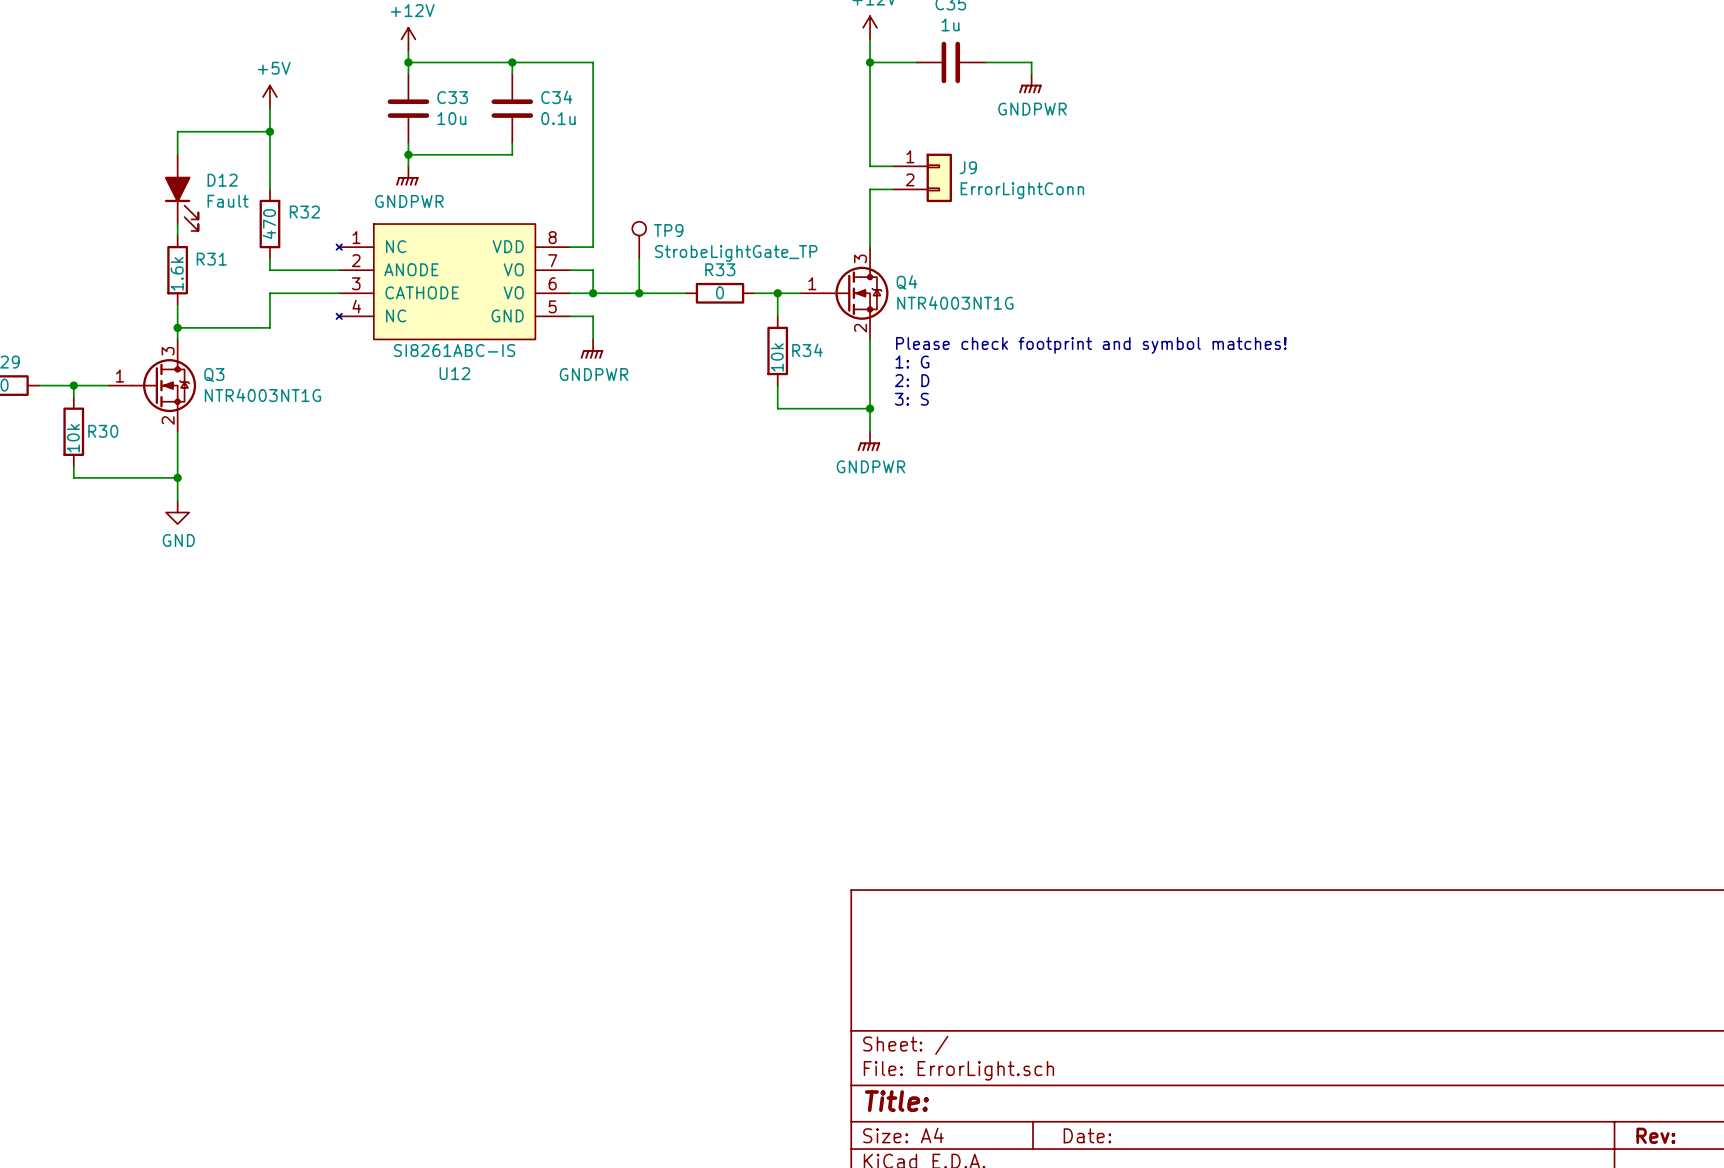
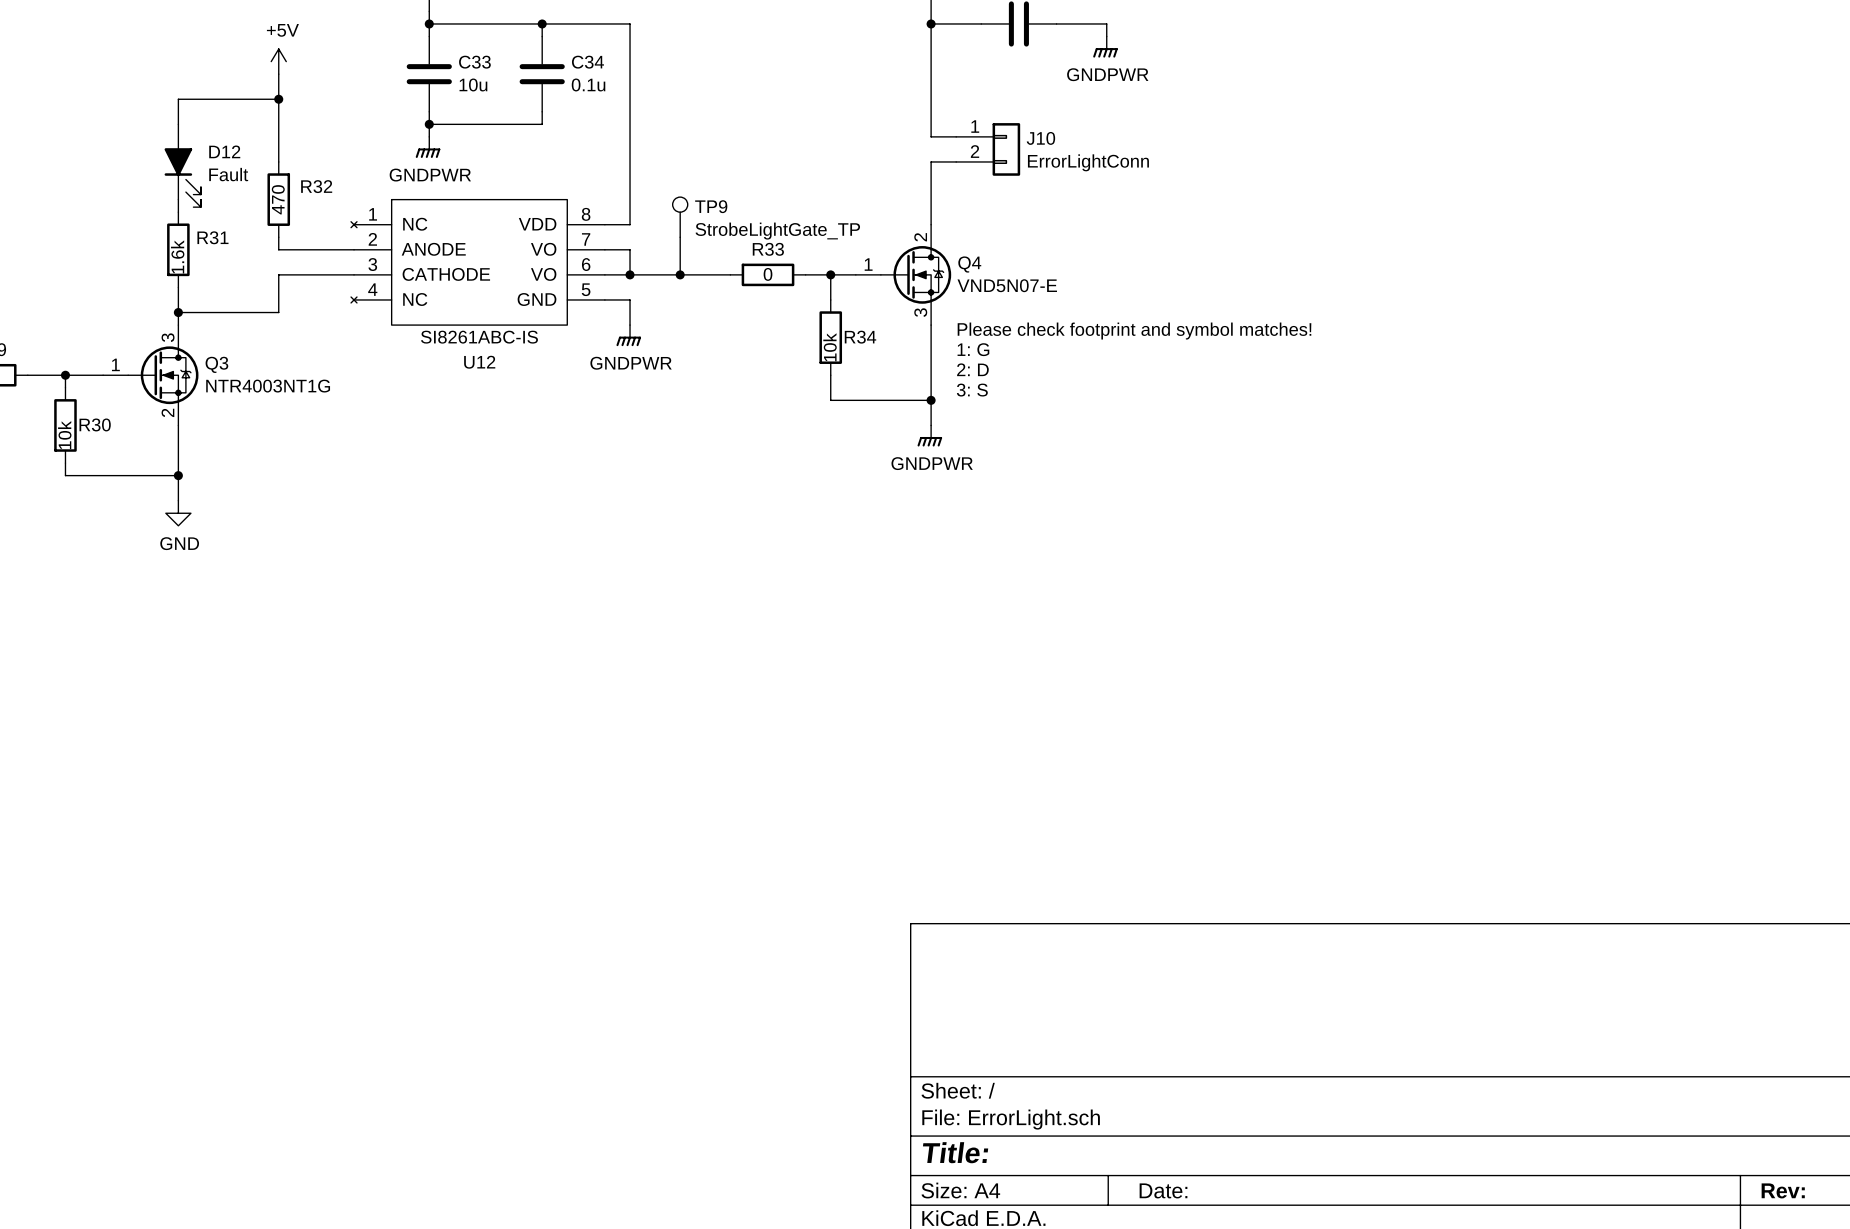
J9 name: J9 (968, 167) -> J10 (1040, 138)
Q4 pin number: 3 (860, 258) -> 2 (920, 237)
Q4 value: NTR4003NT1G (955, 302) -> VND5N07-E (1007, 285)
Q4 pin number: 2 (860, 328) -> 3 (920, 312)

